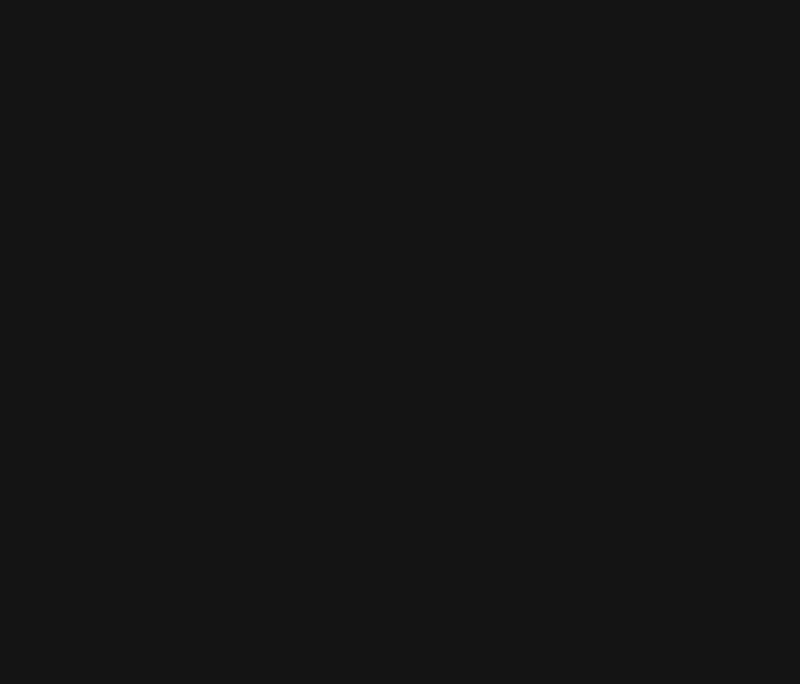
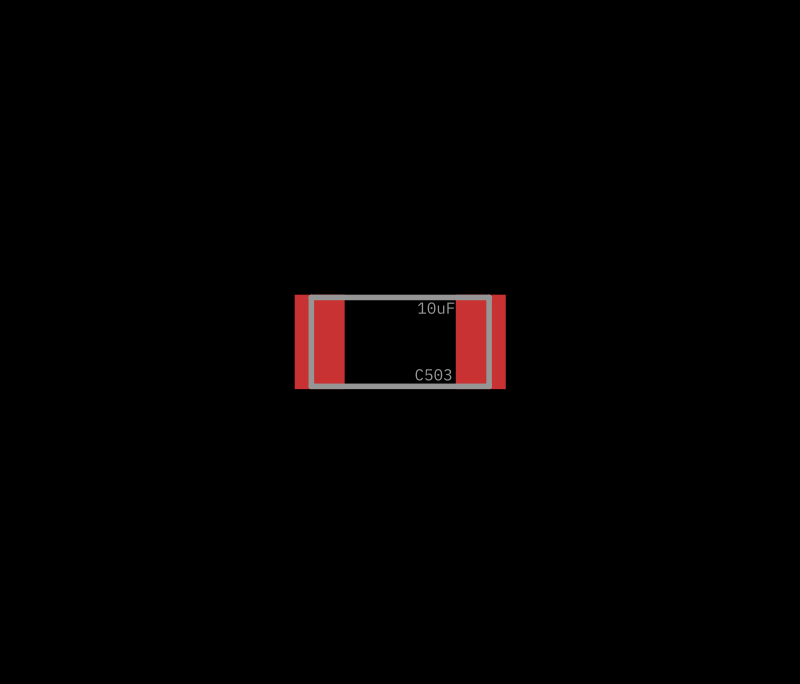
C503: none -> 10uF (400, 341)

